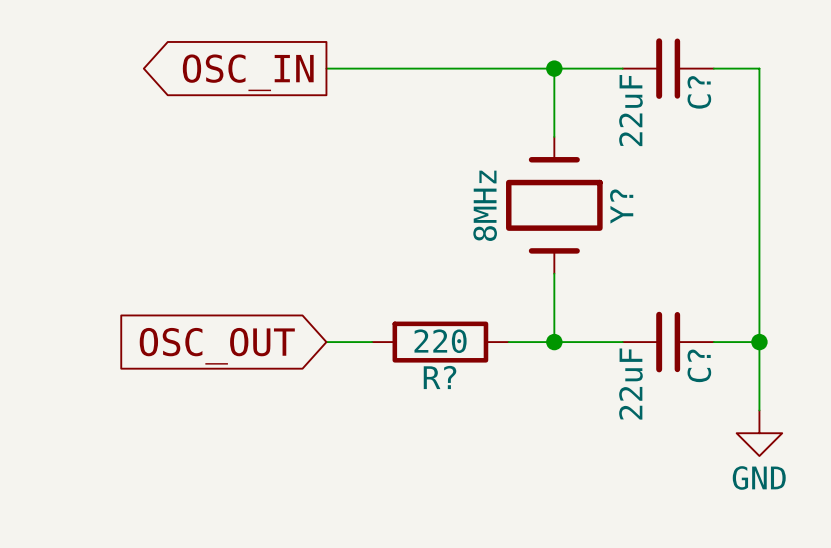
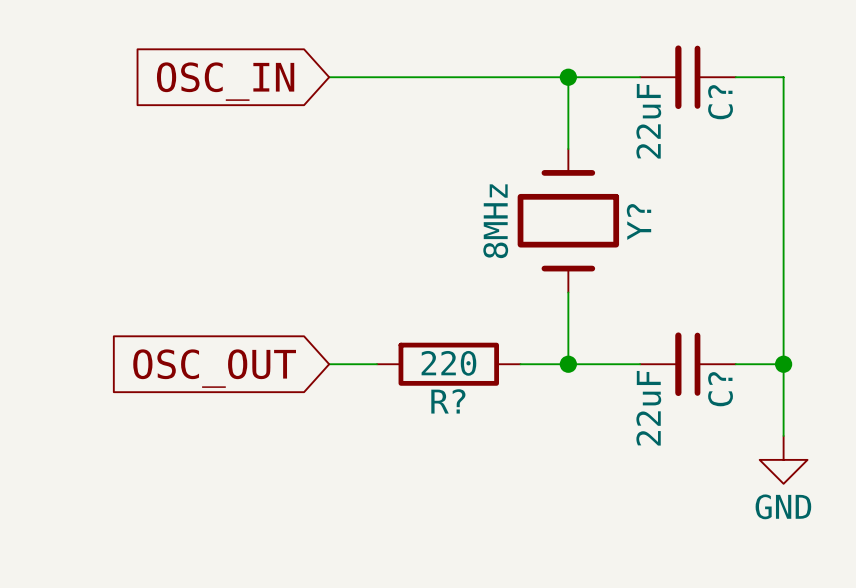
global label shape: output (248, 72) -> input (225, 81)

